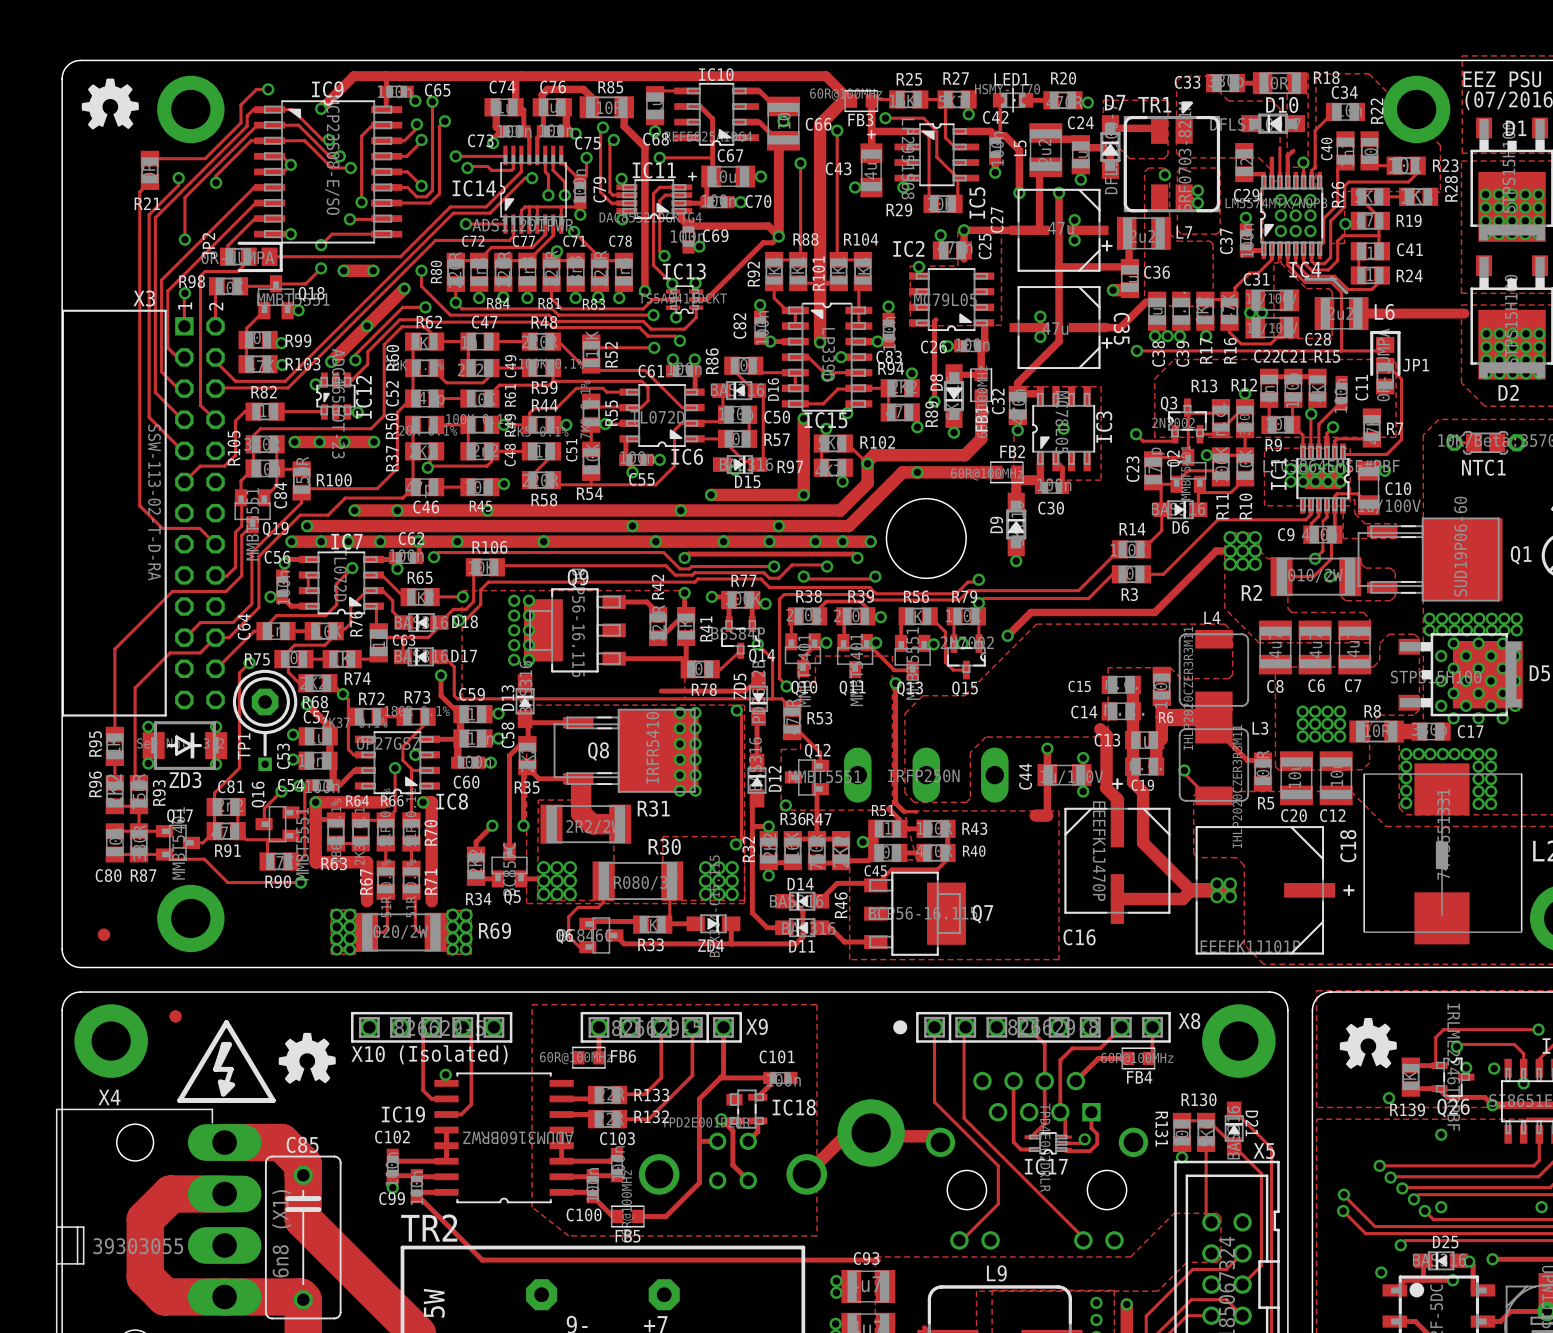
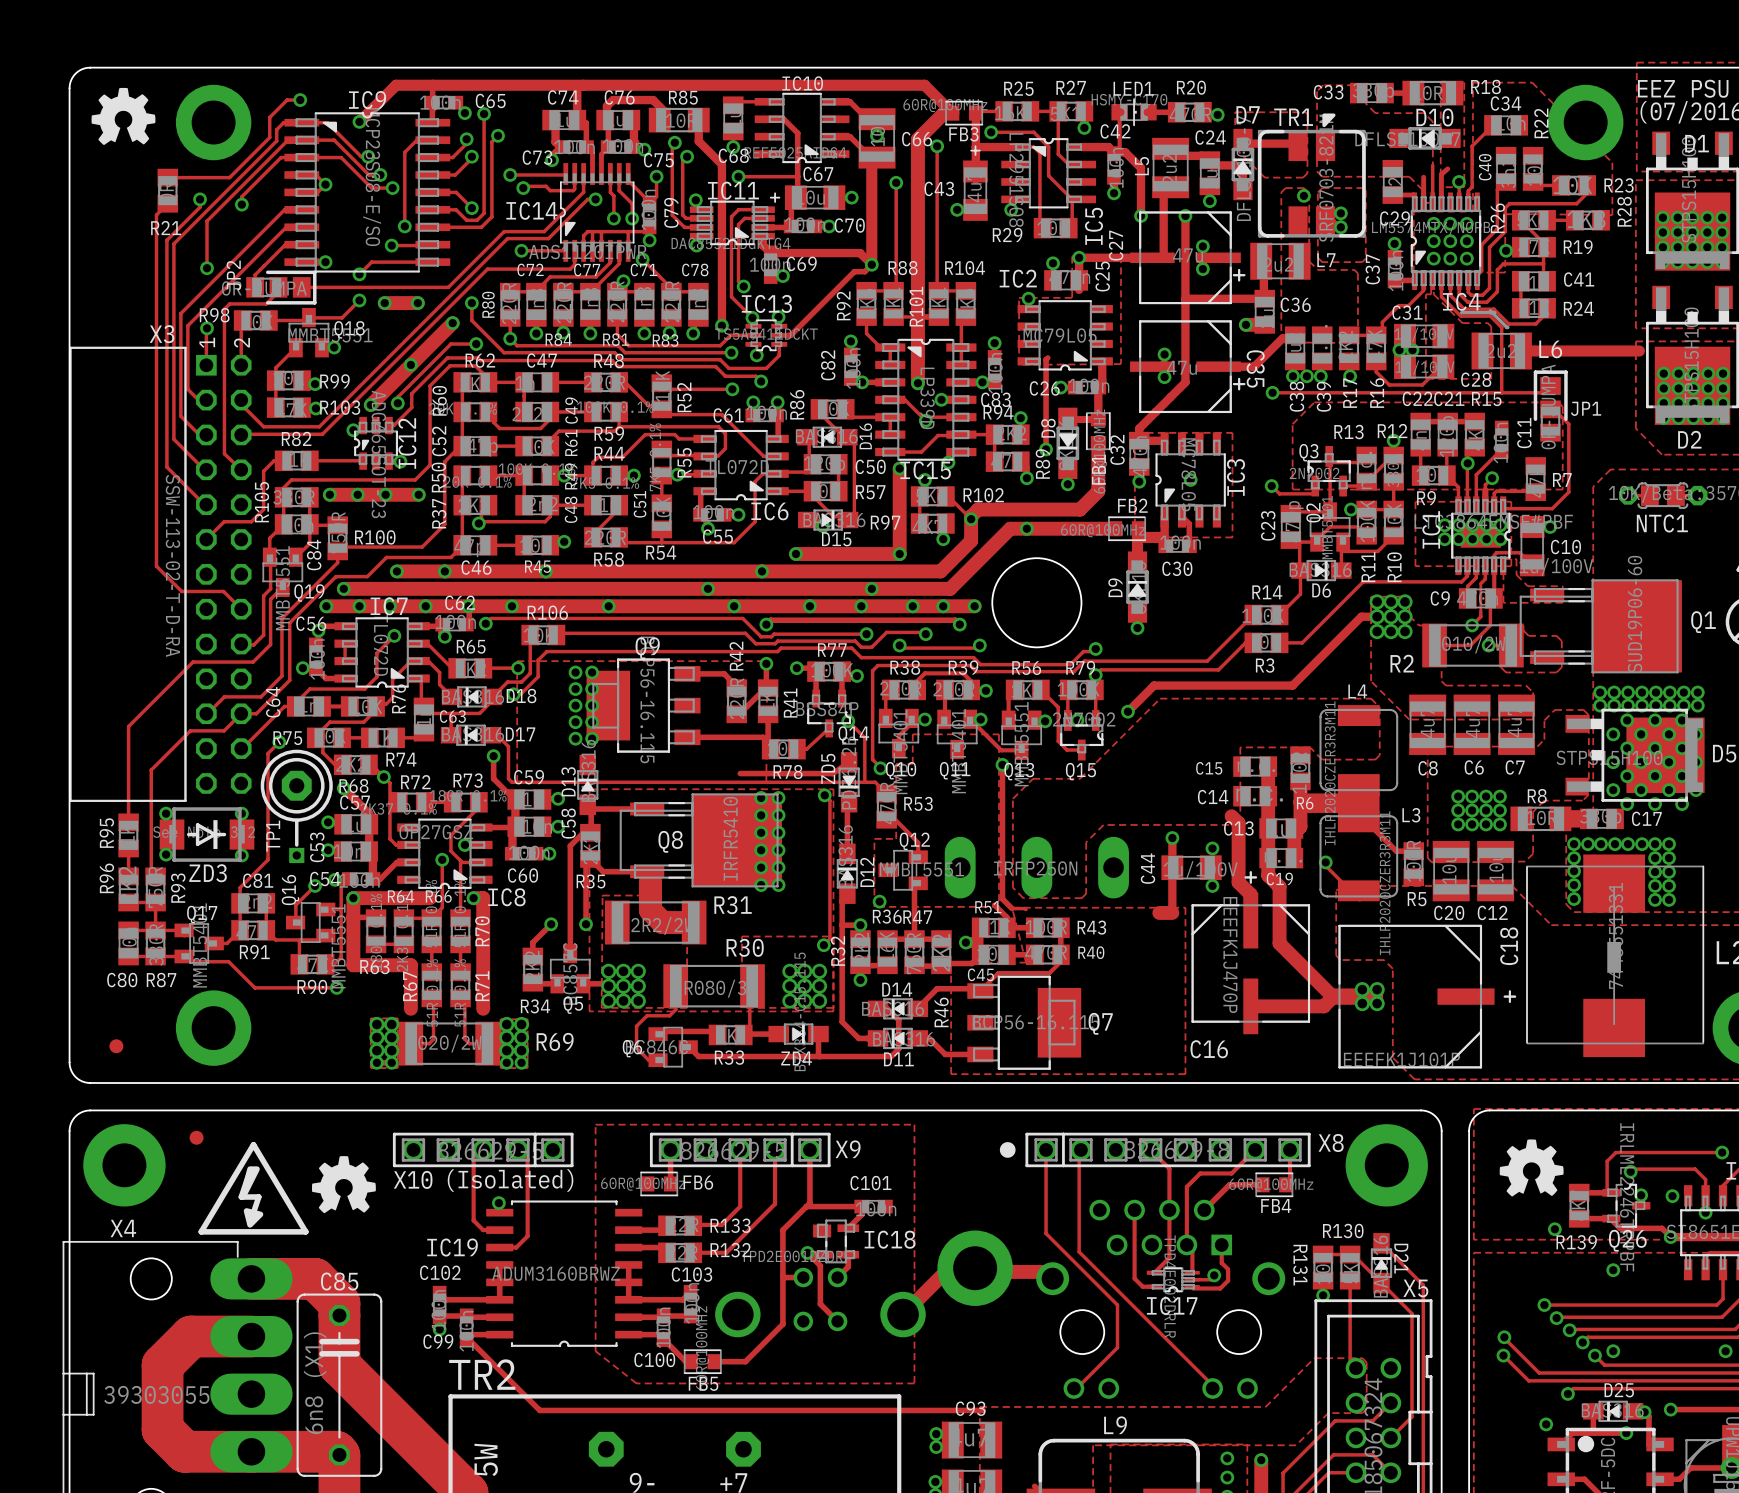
IC19 value rotation: 0° (518, 1137) -> 180° (556, 1273)

